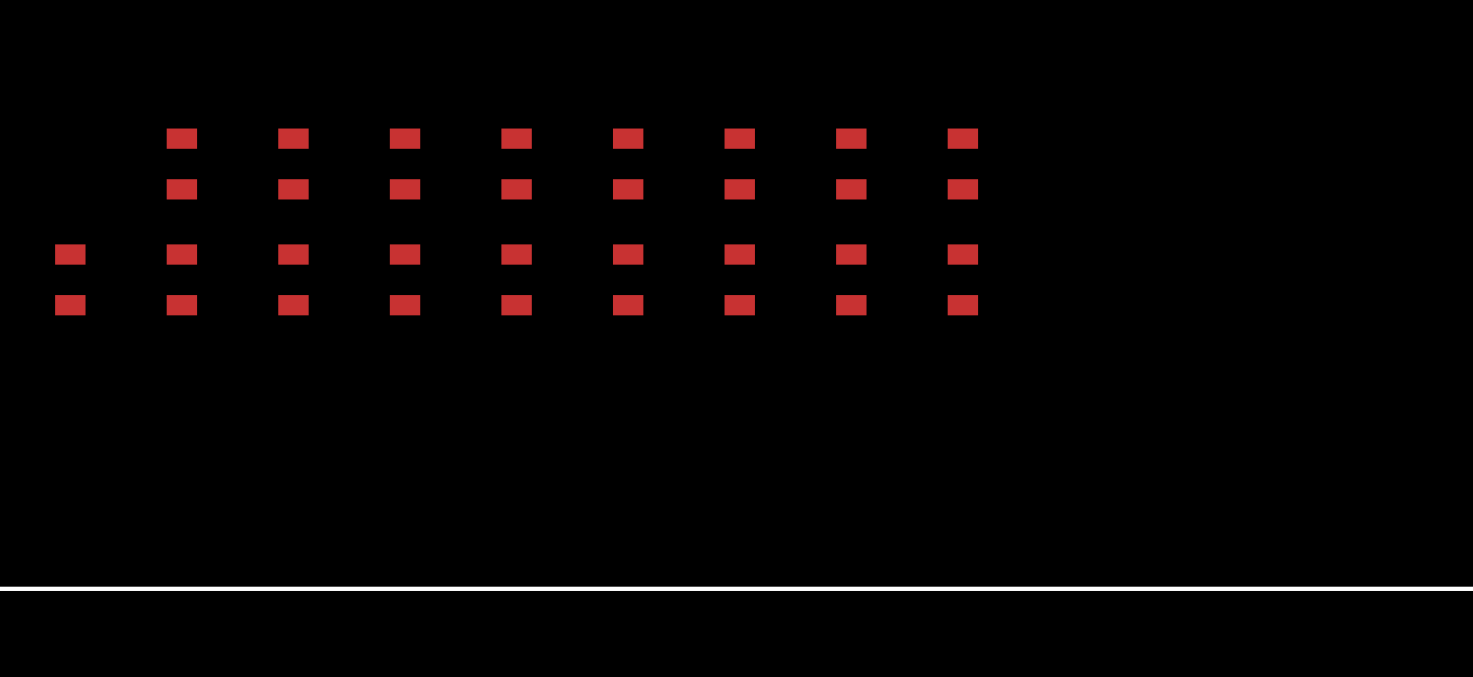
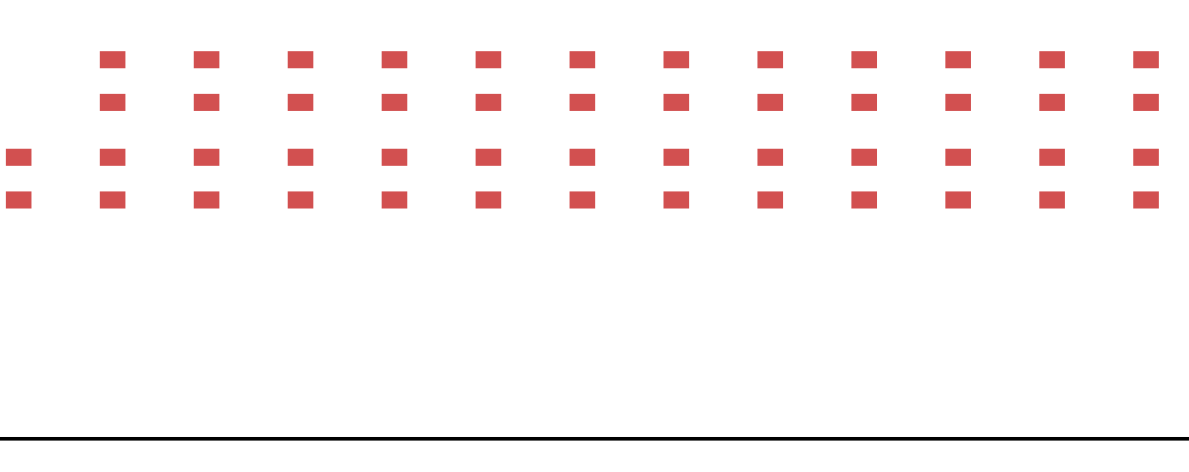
part: none -> (864, 81)
part: none -> (958, 81)
part: none -> (1052, 81)
part: none -> (1146, 81)
part: none -> (864, 178)
part: none -> (958, 178)
part: none -> (1052, 178)
part: none -> (1146, 178)

